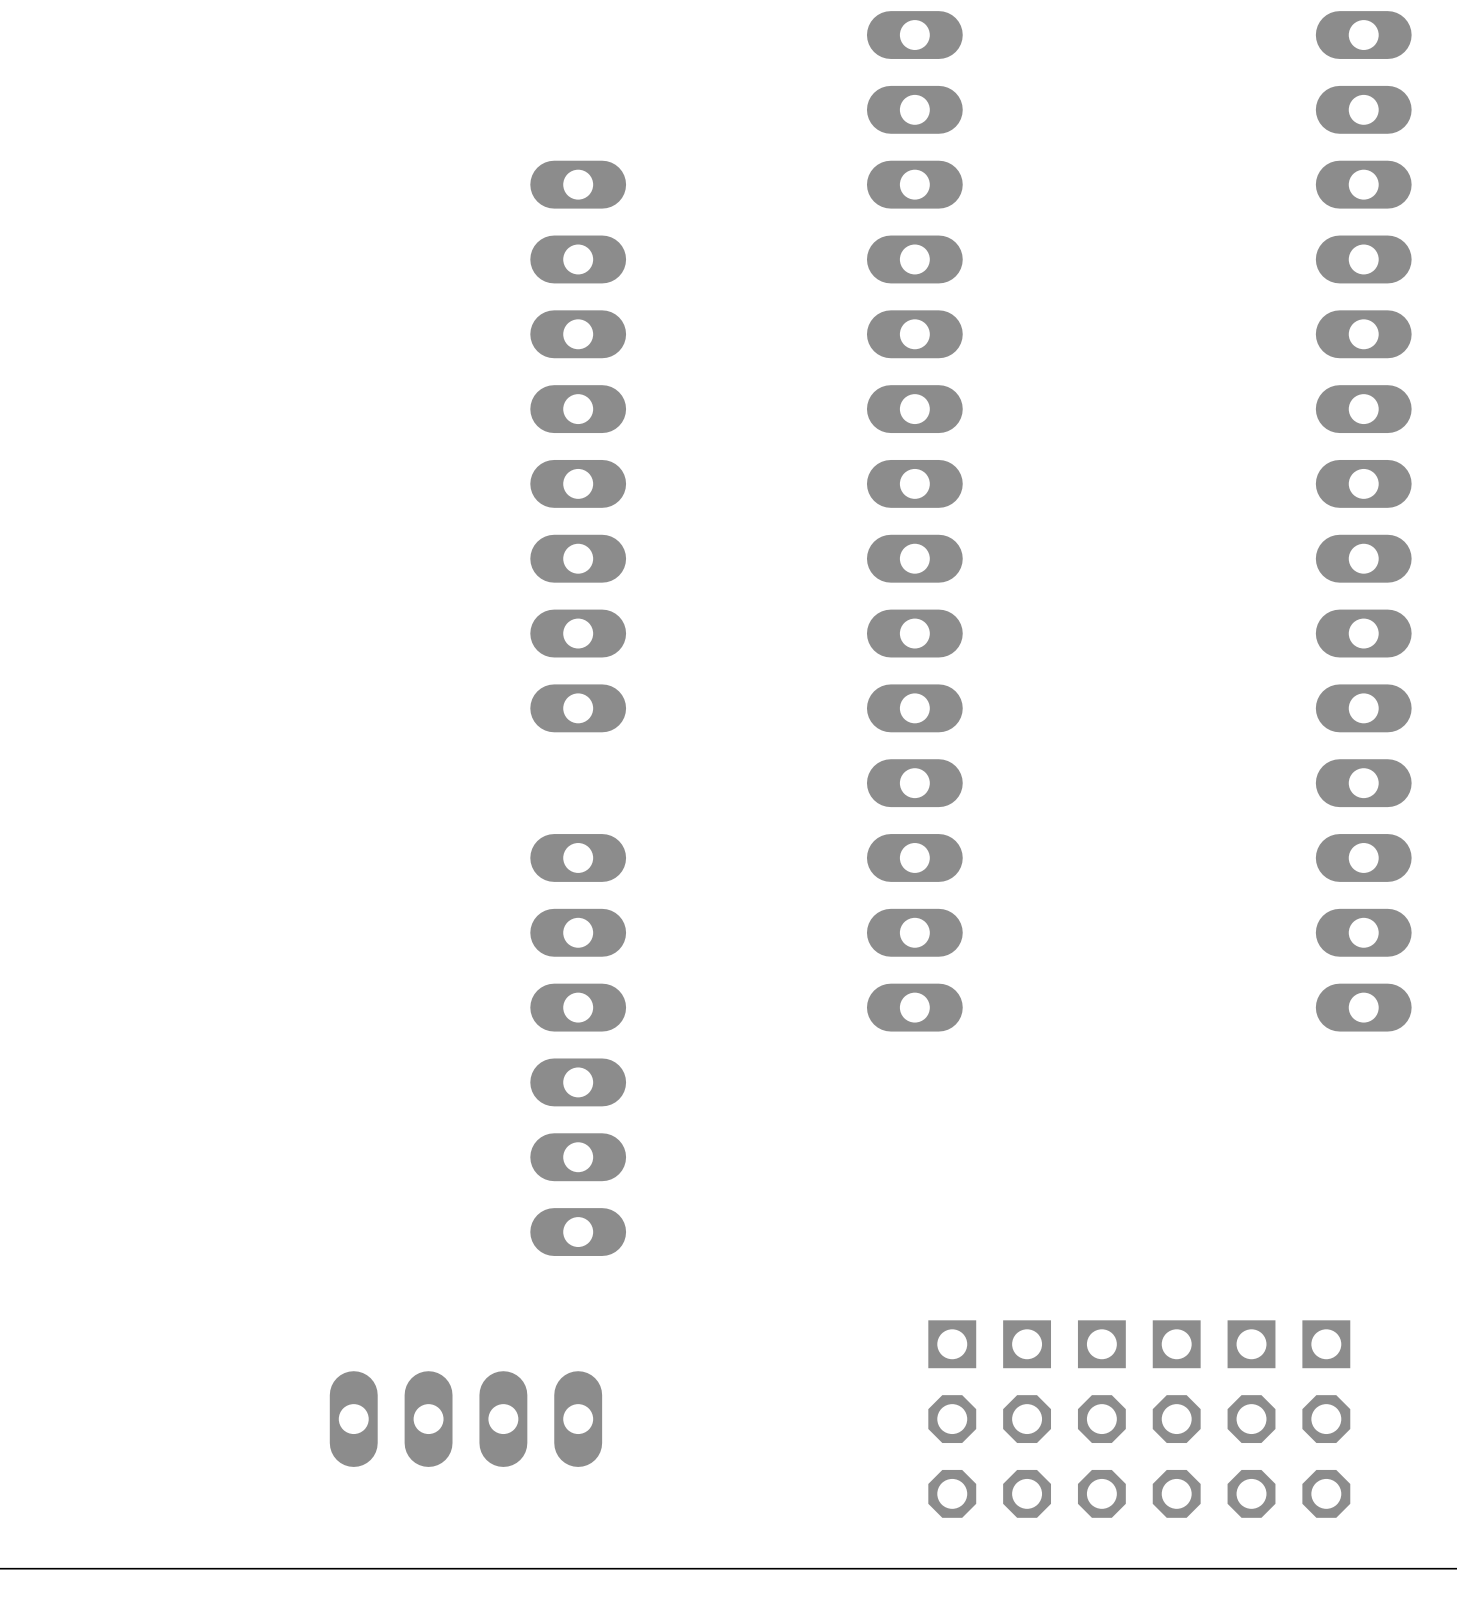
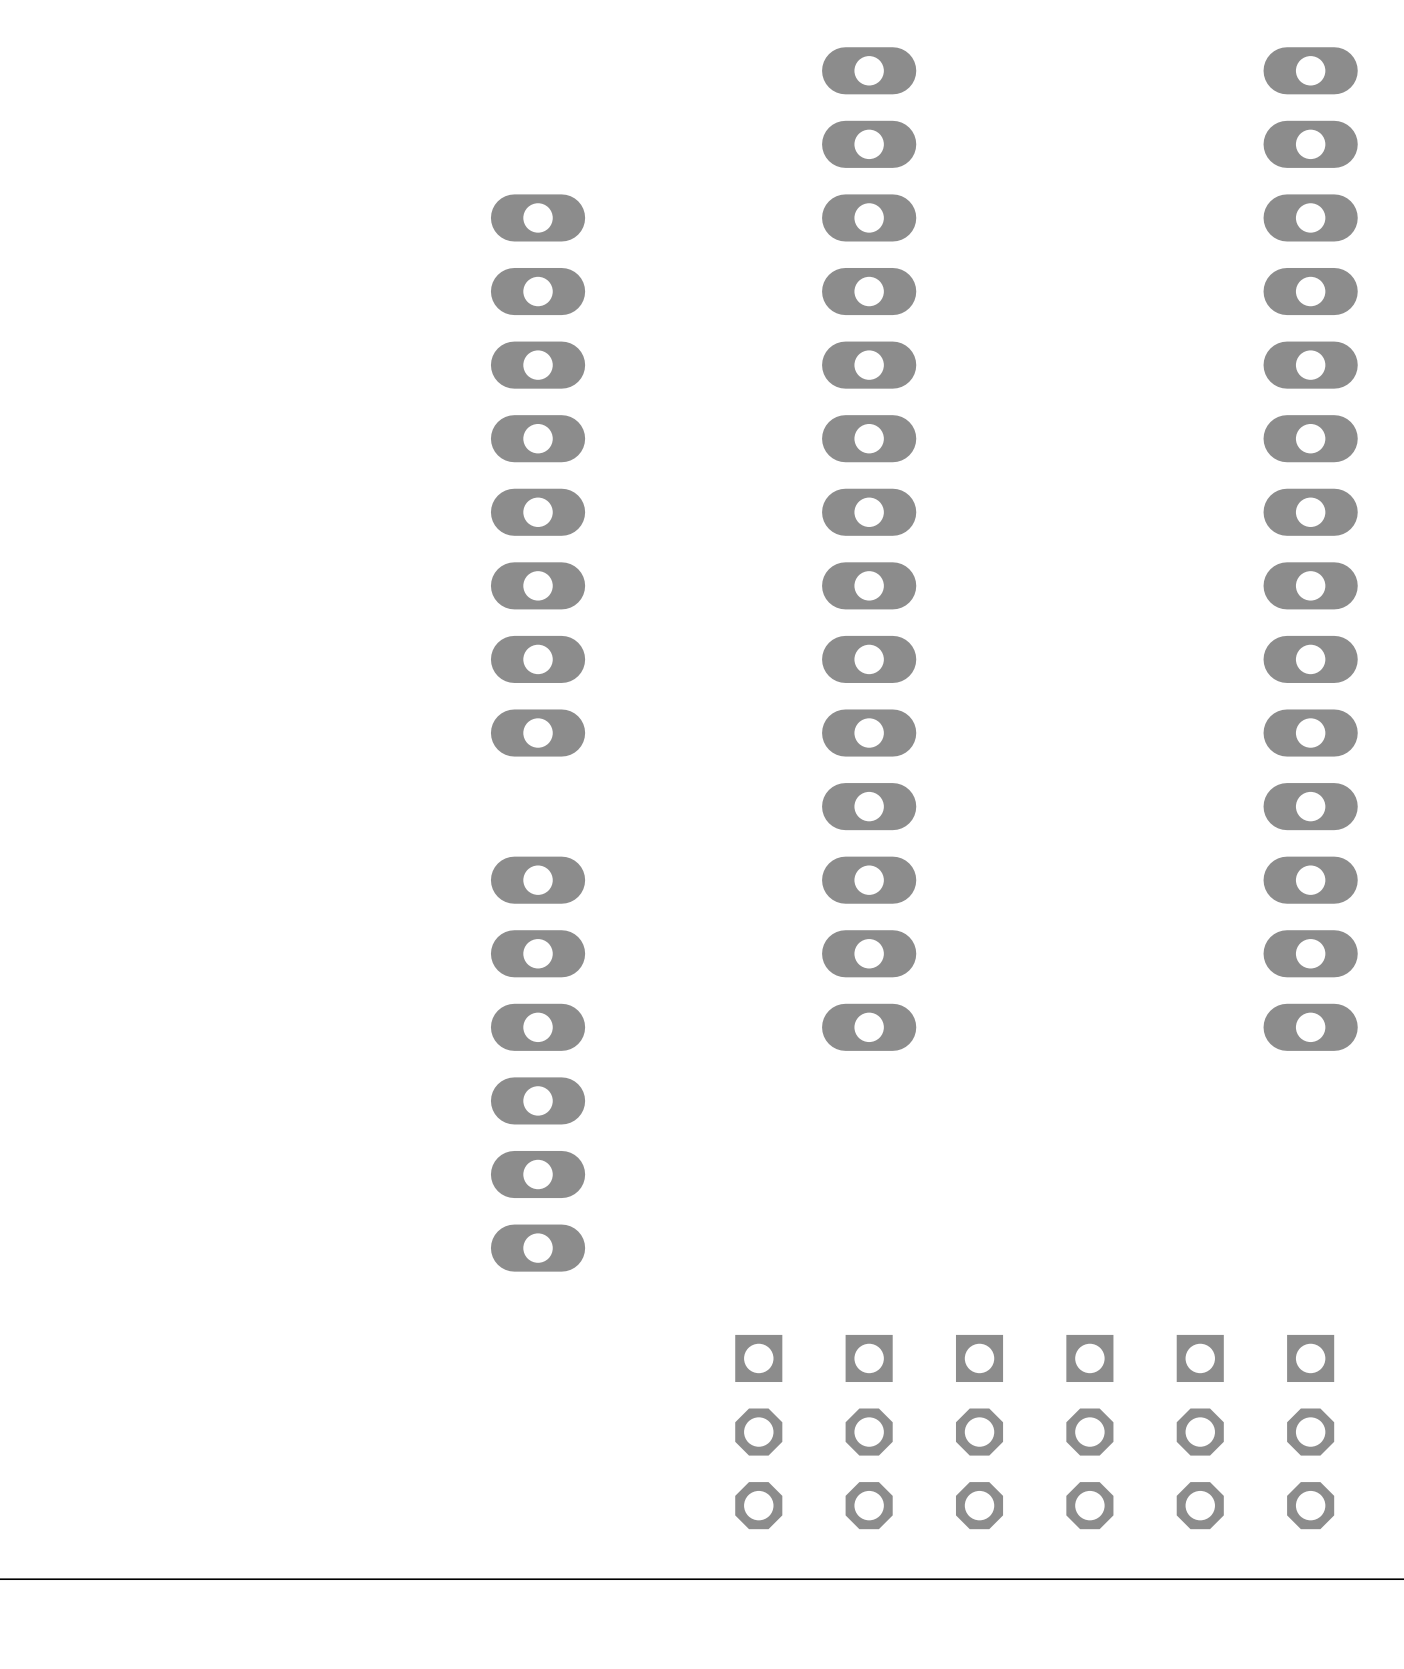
part: (465, 1419) -> none
part: none -> (758, 1432)
part position: (952, 1419) -> (869, 1432)
part: (1101, 1419) -> none
part: none -> (1089, 1432)
part: (1176, 1419) -> none
part position: (1326, 1419) -> (1310, 1432)

